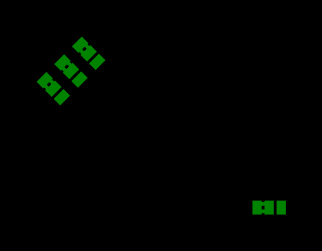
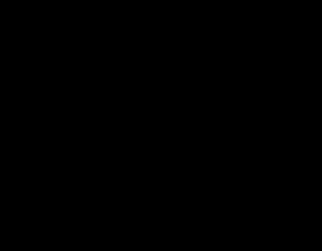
part: (88, 53) -> none
part: (70, 70) -> none
part: (53, 88) -> none
part: (269, 207) -> none

